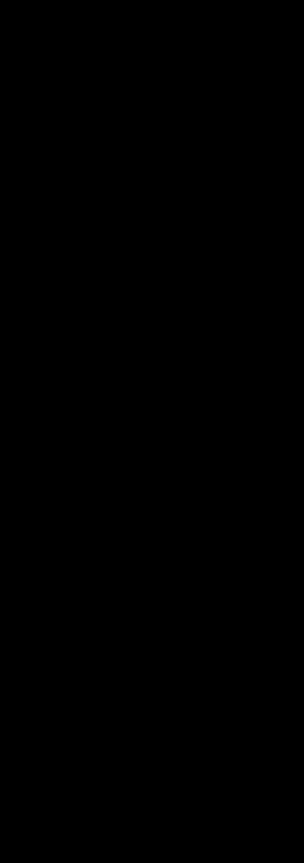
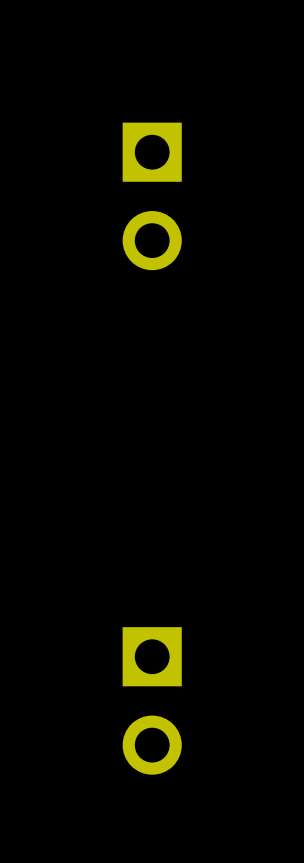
part: none -> (152, 196)
part: none -> (152, 700)

